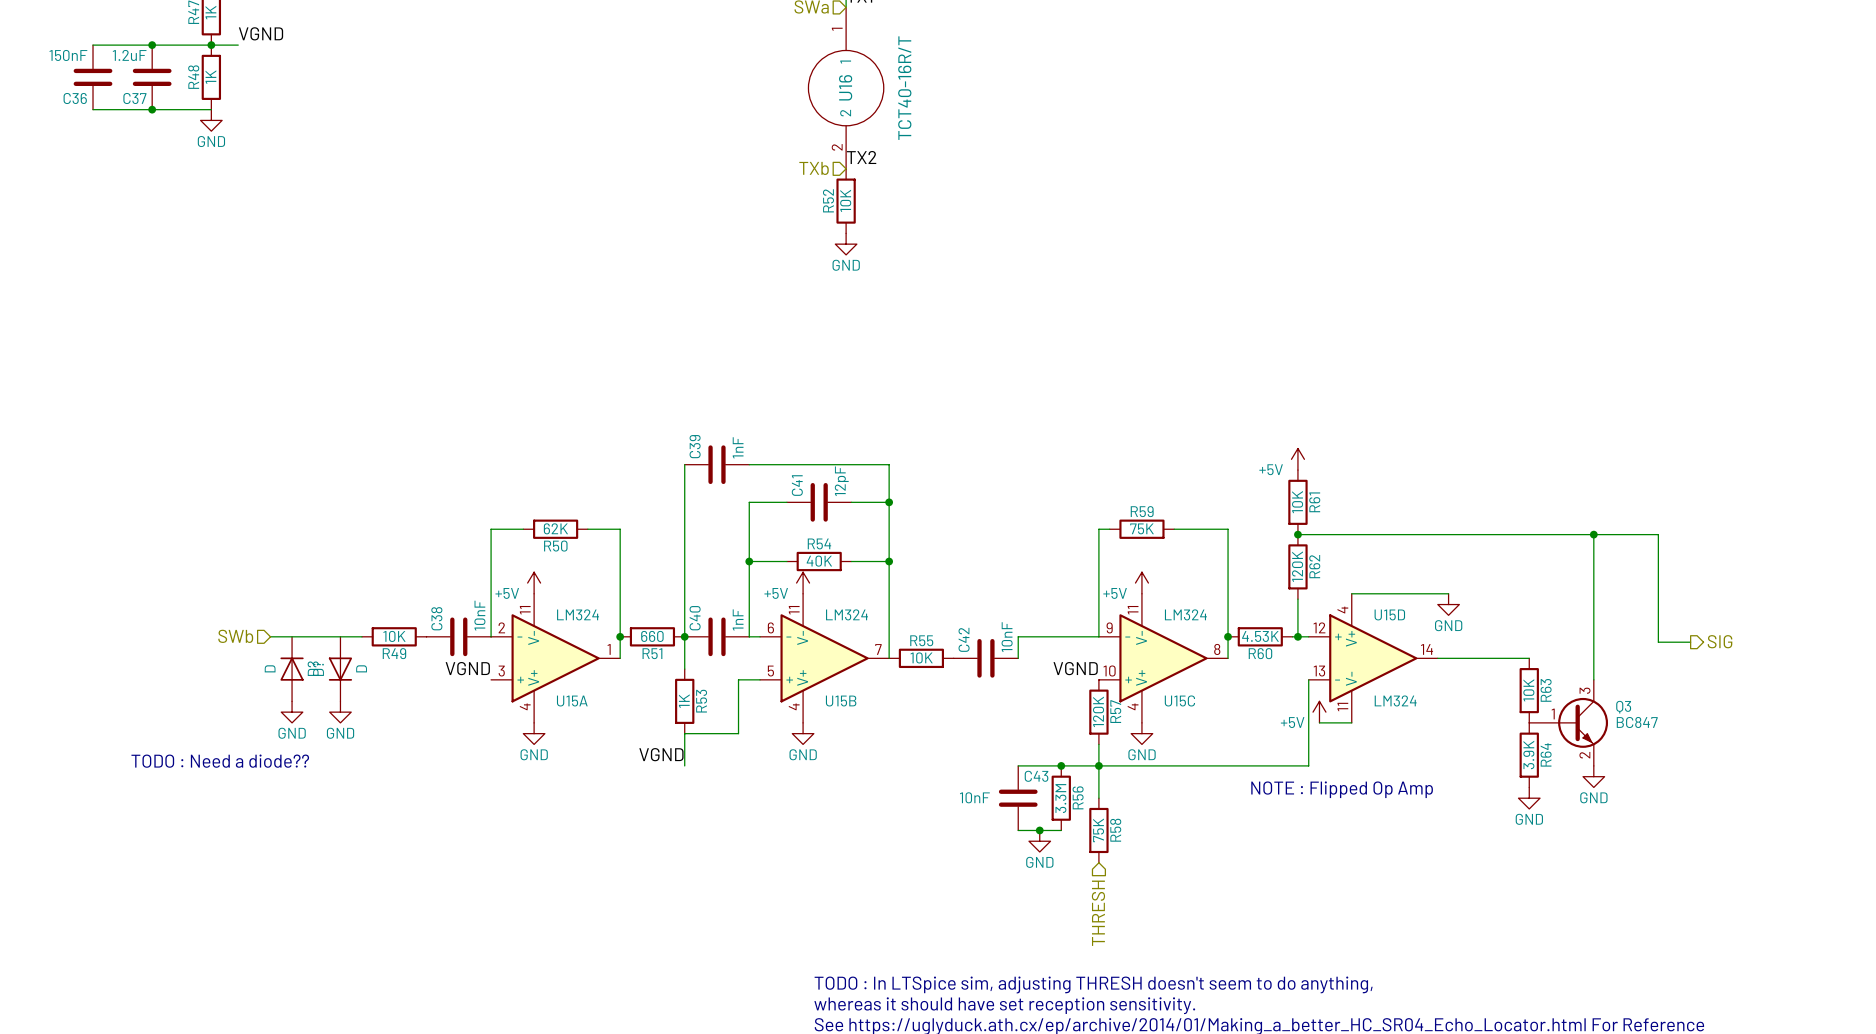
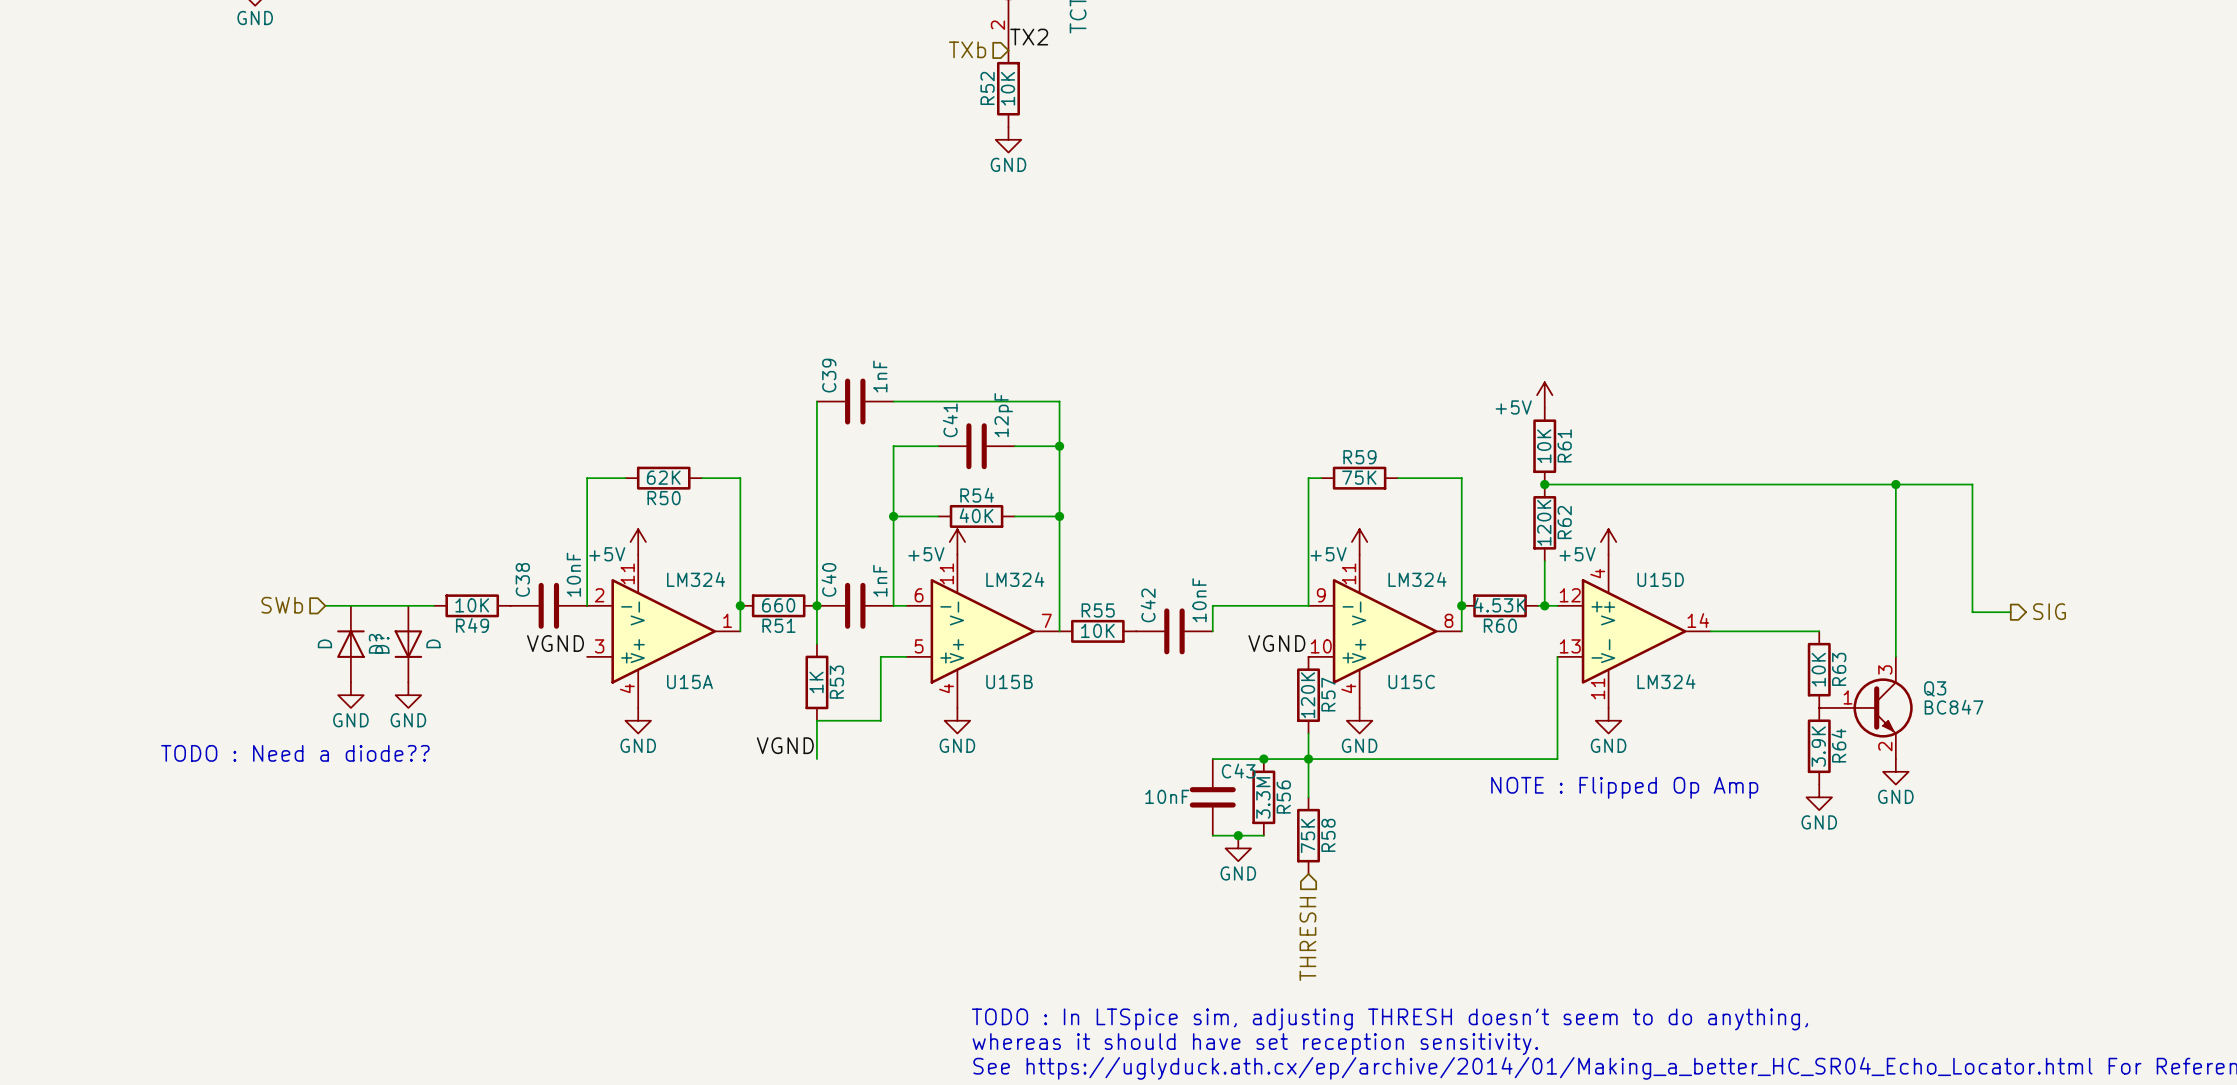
wire: (1351, 593) (1448, 593) -> none
power symbol position: GND (1448, 604) -> GND (1608, 720)
power symbol position: +5V (1319, 712) -> +5V (1608, 541)
wire: (1319, 722) (1351, 722) -> none

